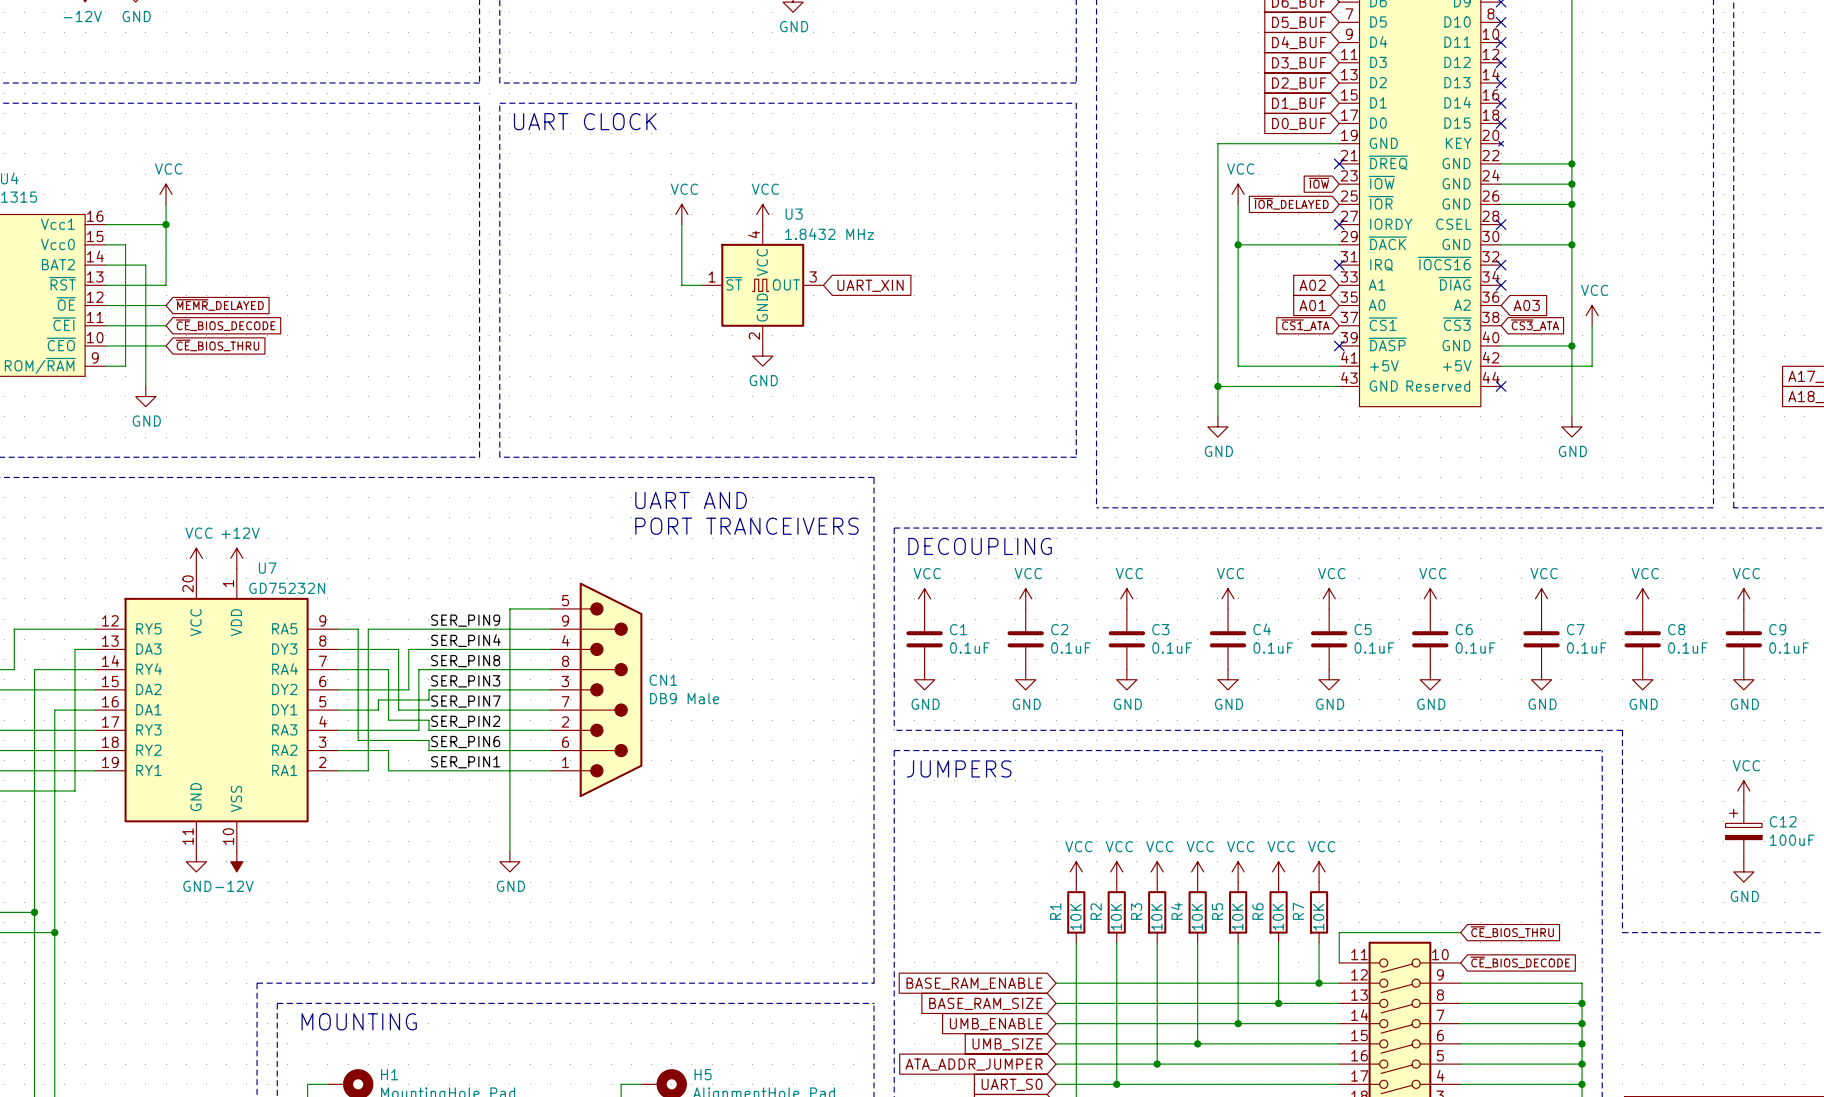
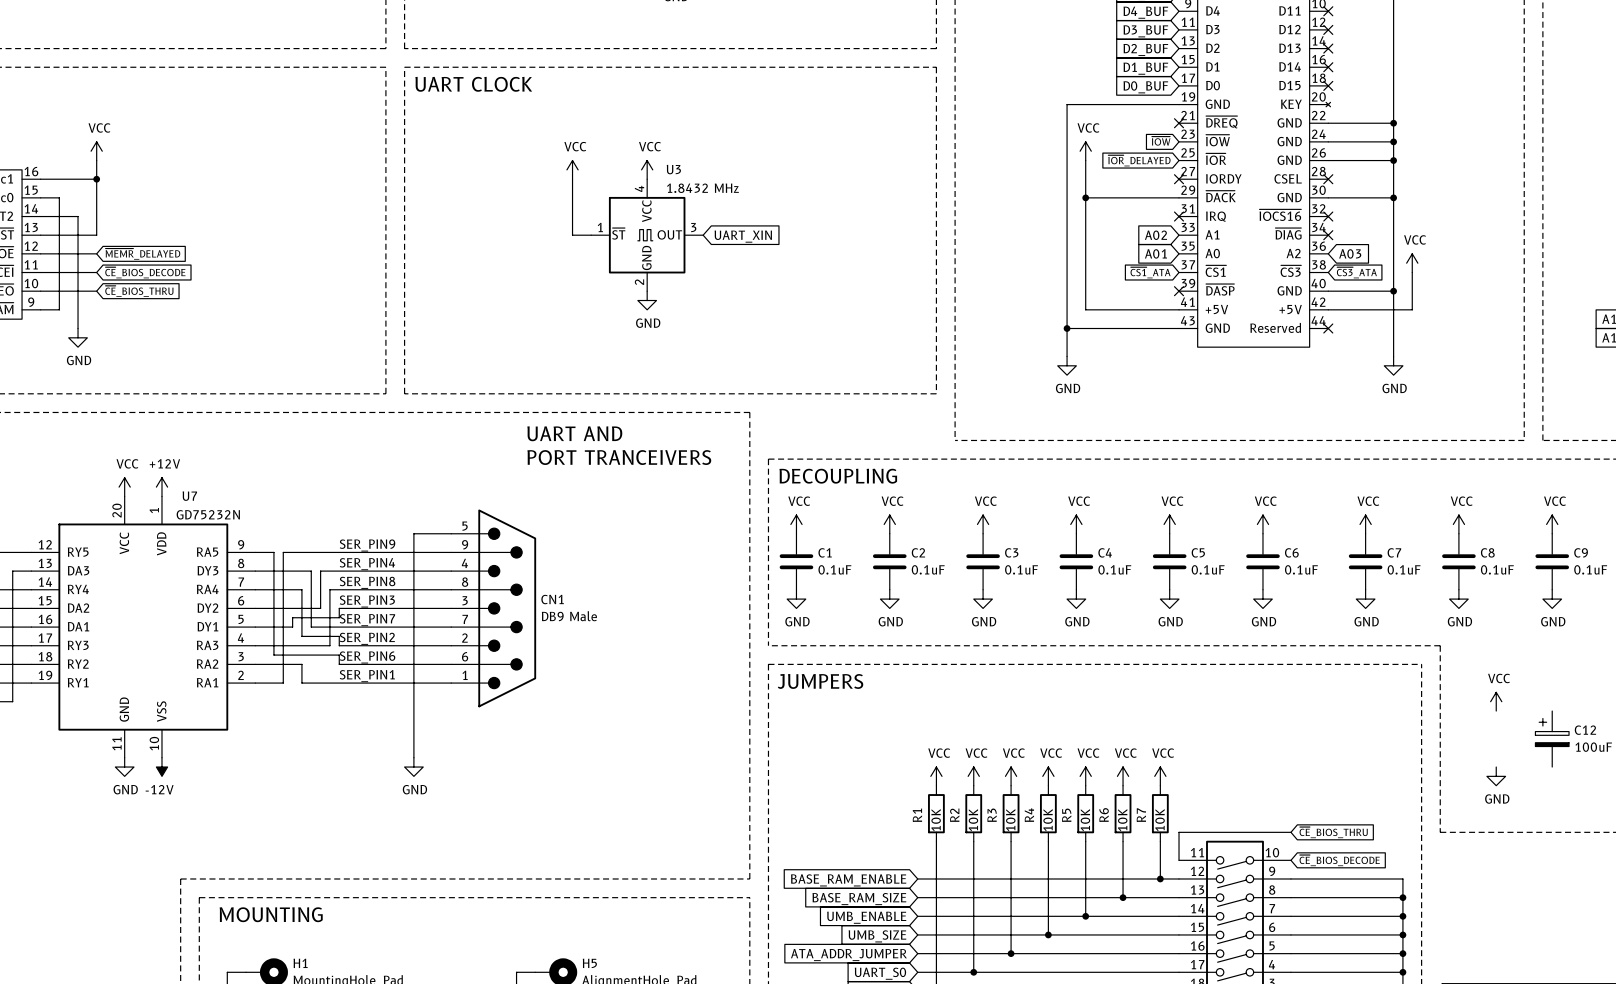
power symbol position: VCC (1743, 791) -> VCC (1496, 701)
power symbol position: GND (1743, 871) -> GND (1496, 776)

